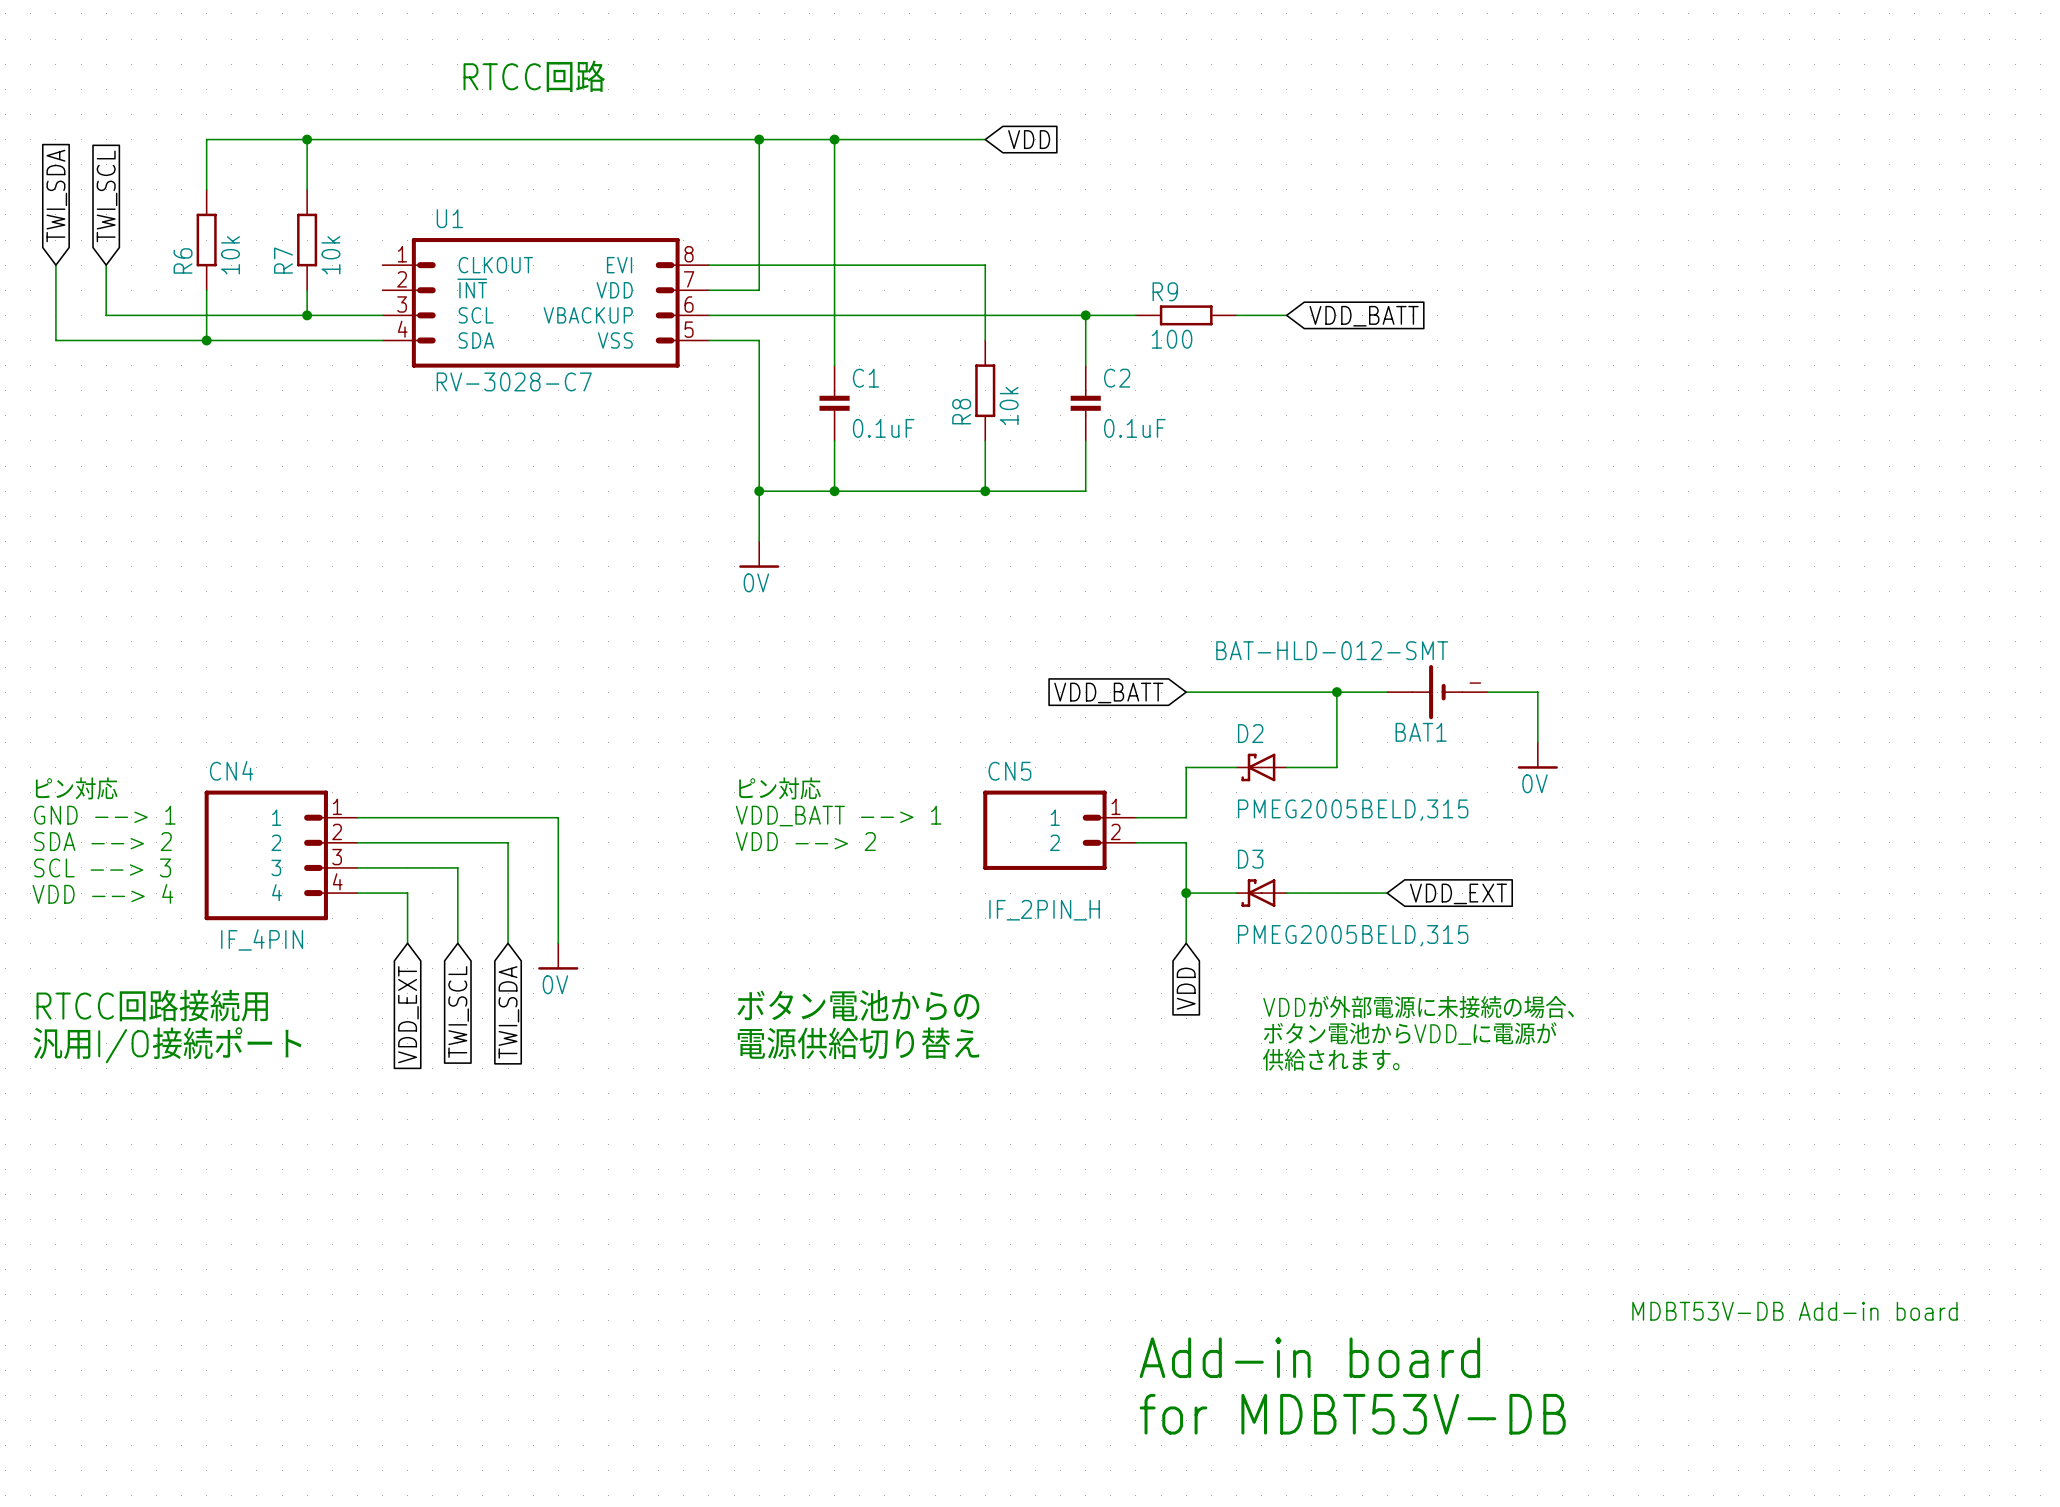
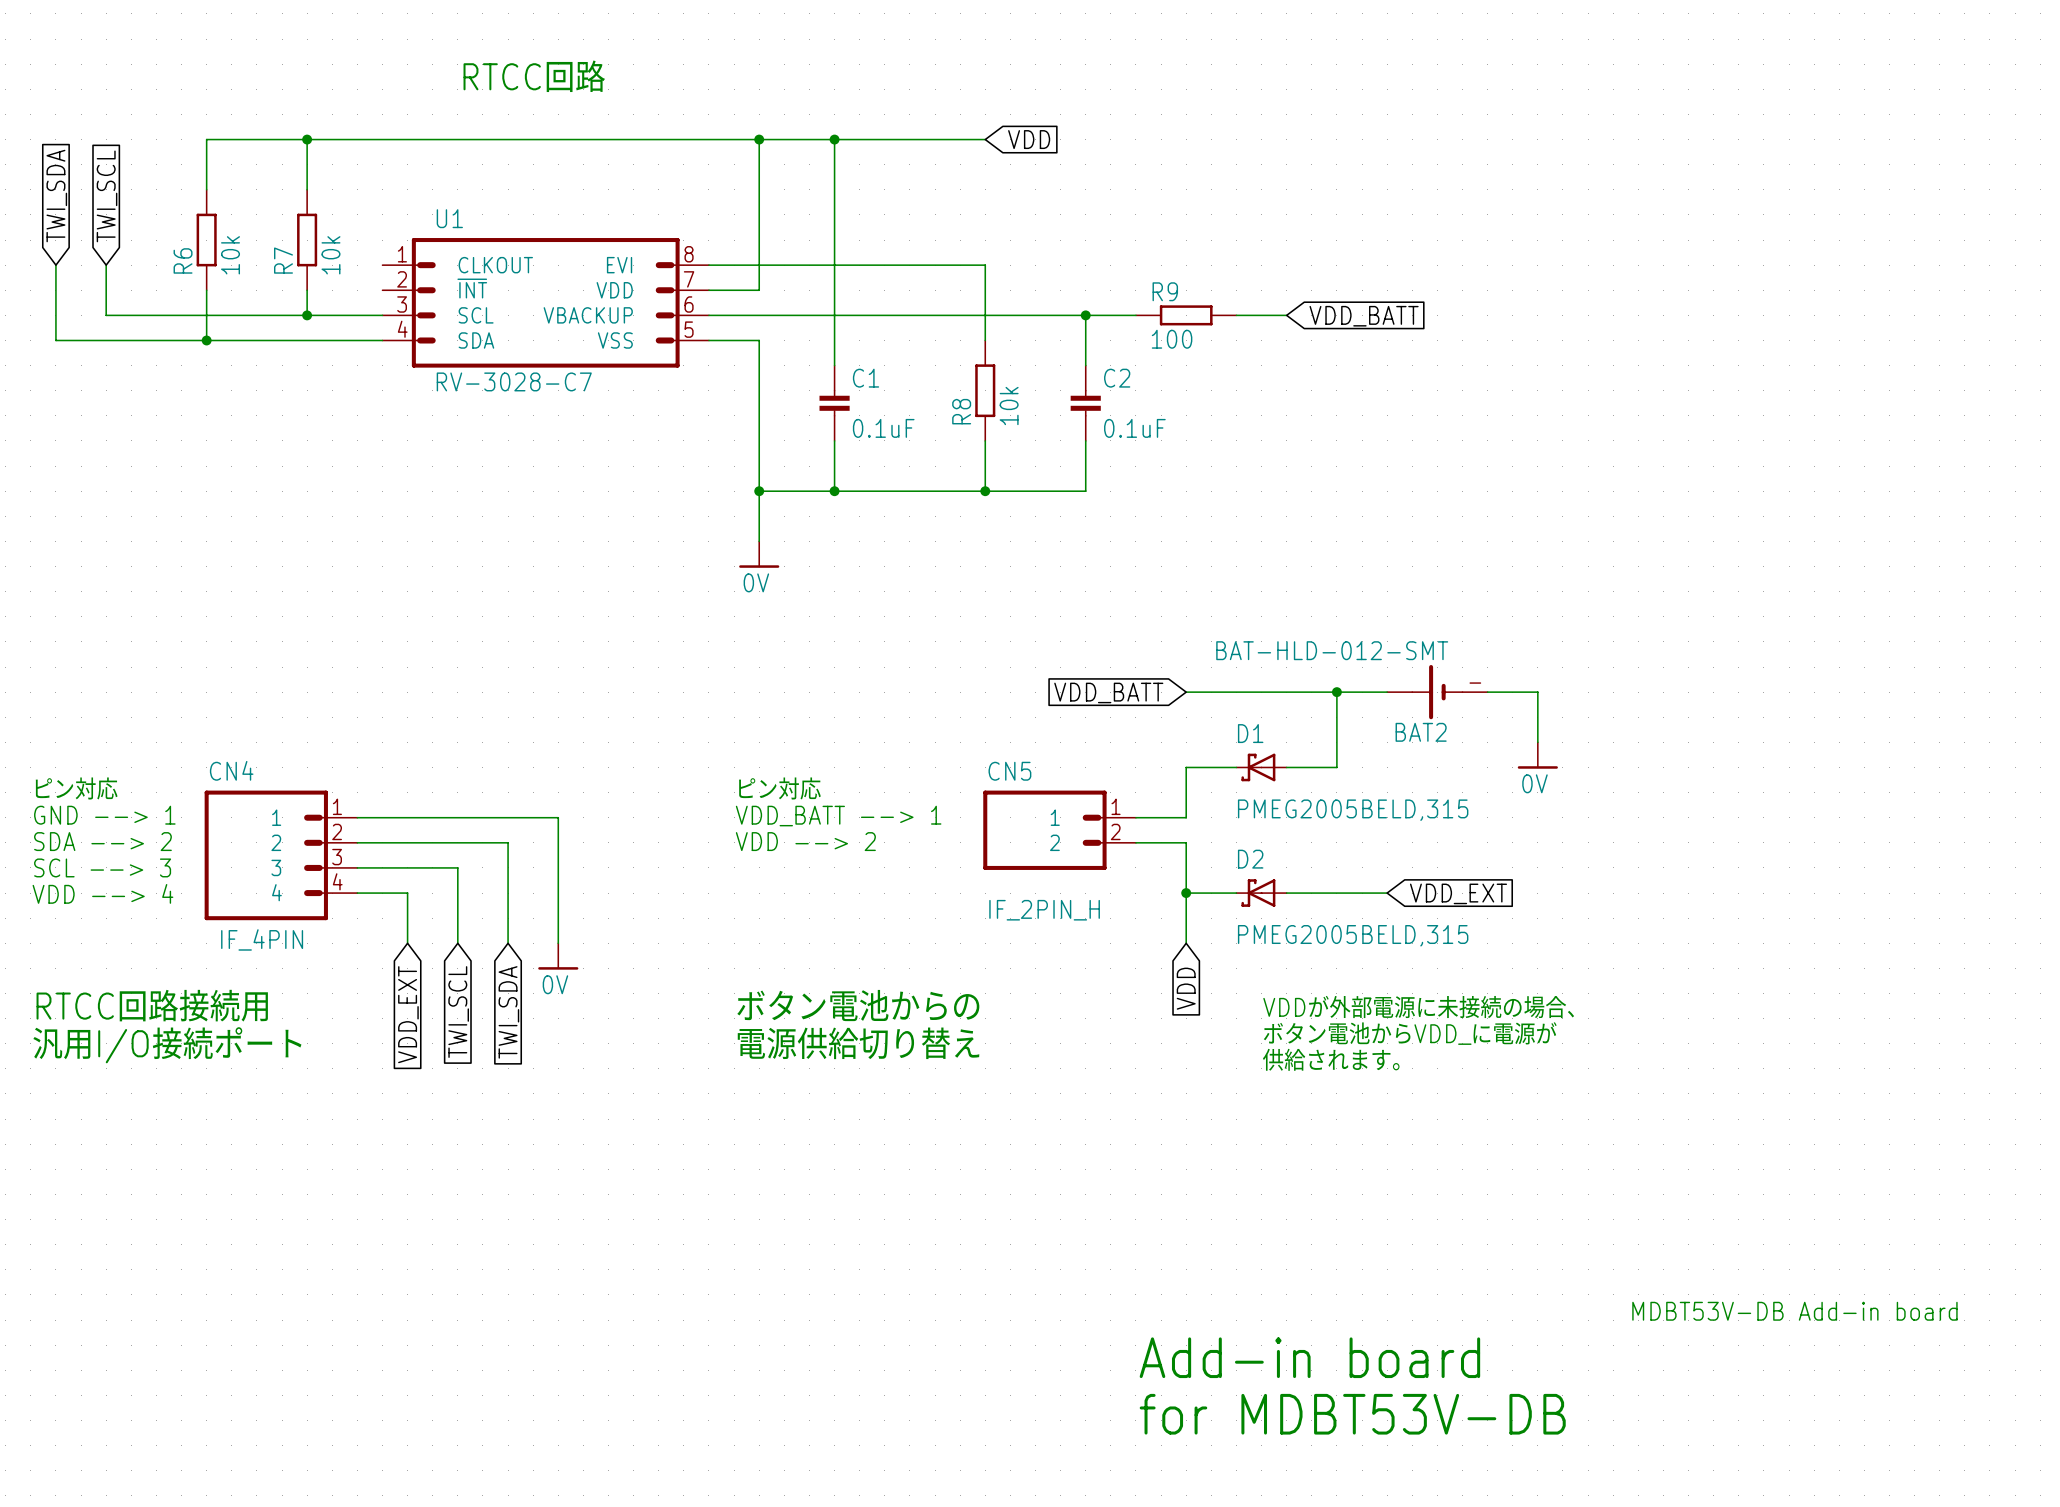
BAT1 name: BAT1 (1421, 732) -> BAT2 (1421, 732)
D2 name: D2 (1250, 733) -> D1 (1250, 733)
D3 name: D3 (1250, 859) -> D2 (1250, 859)

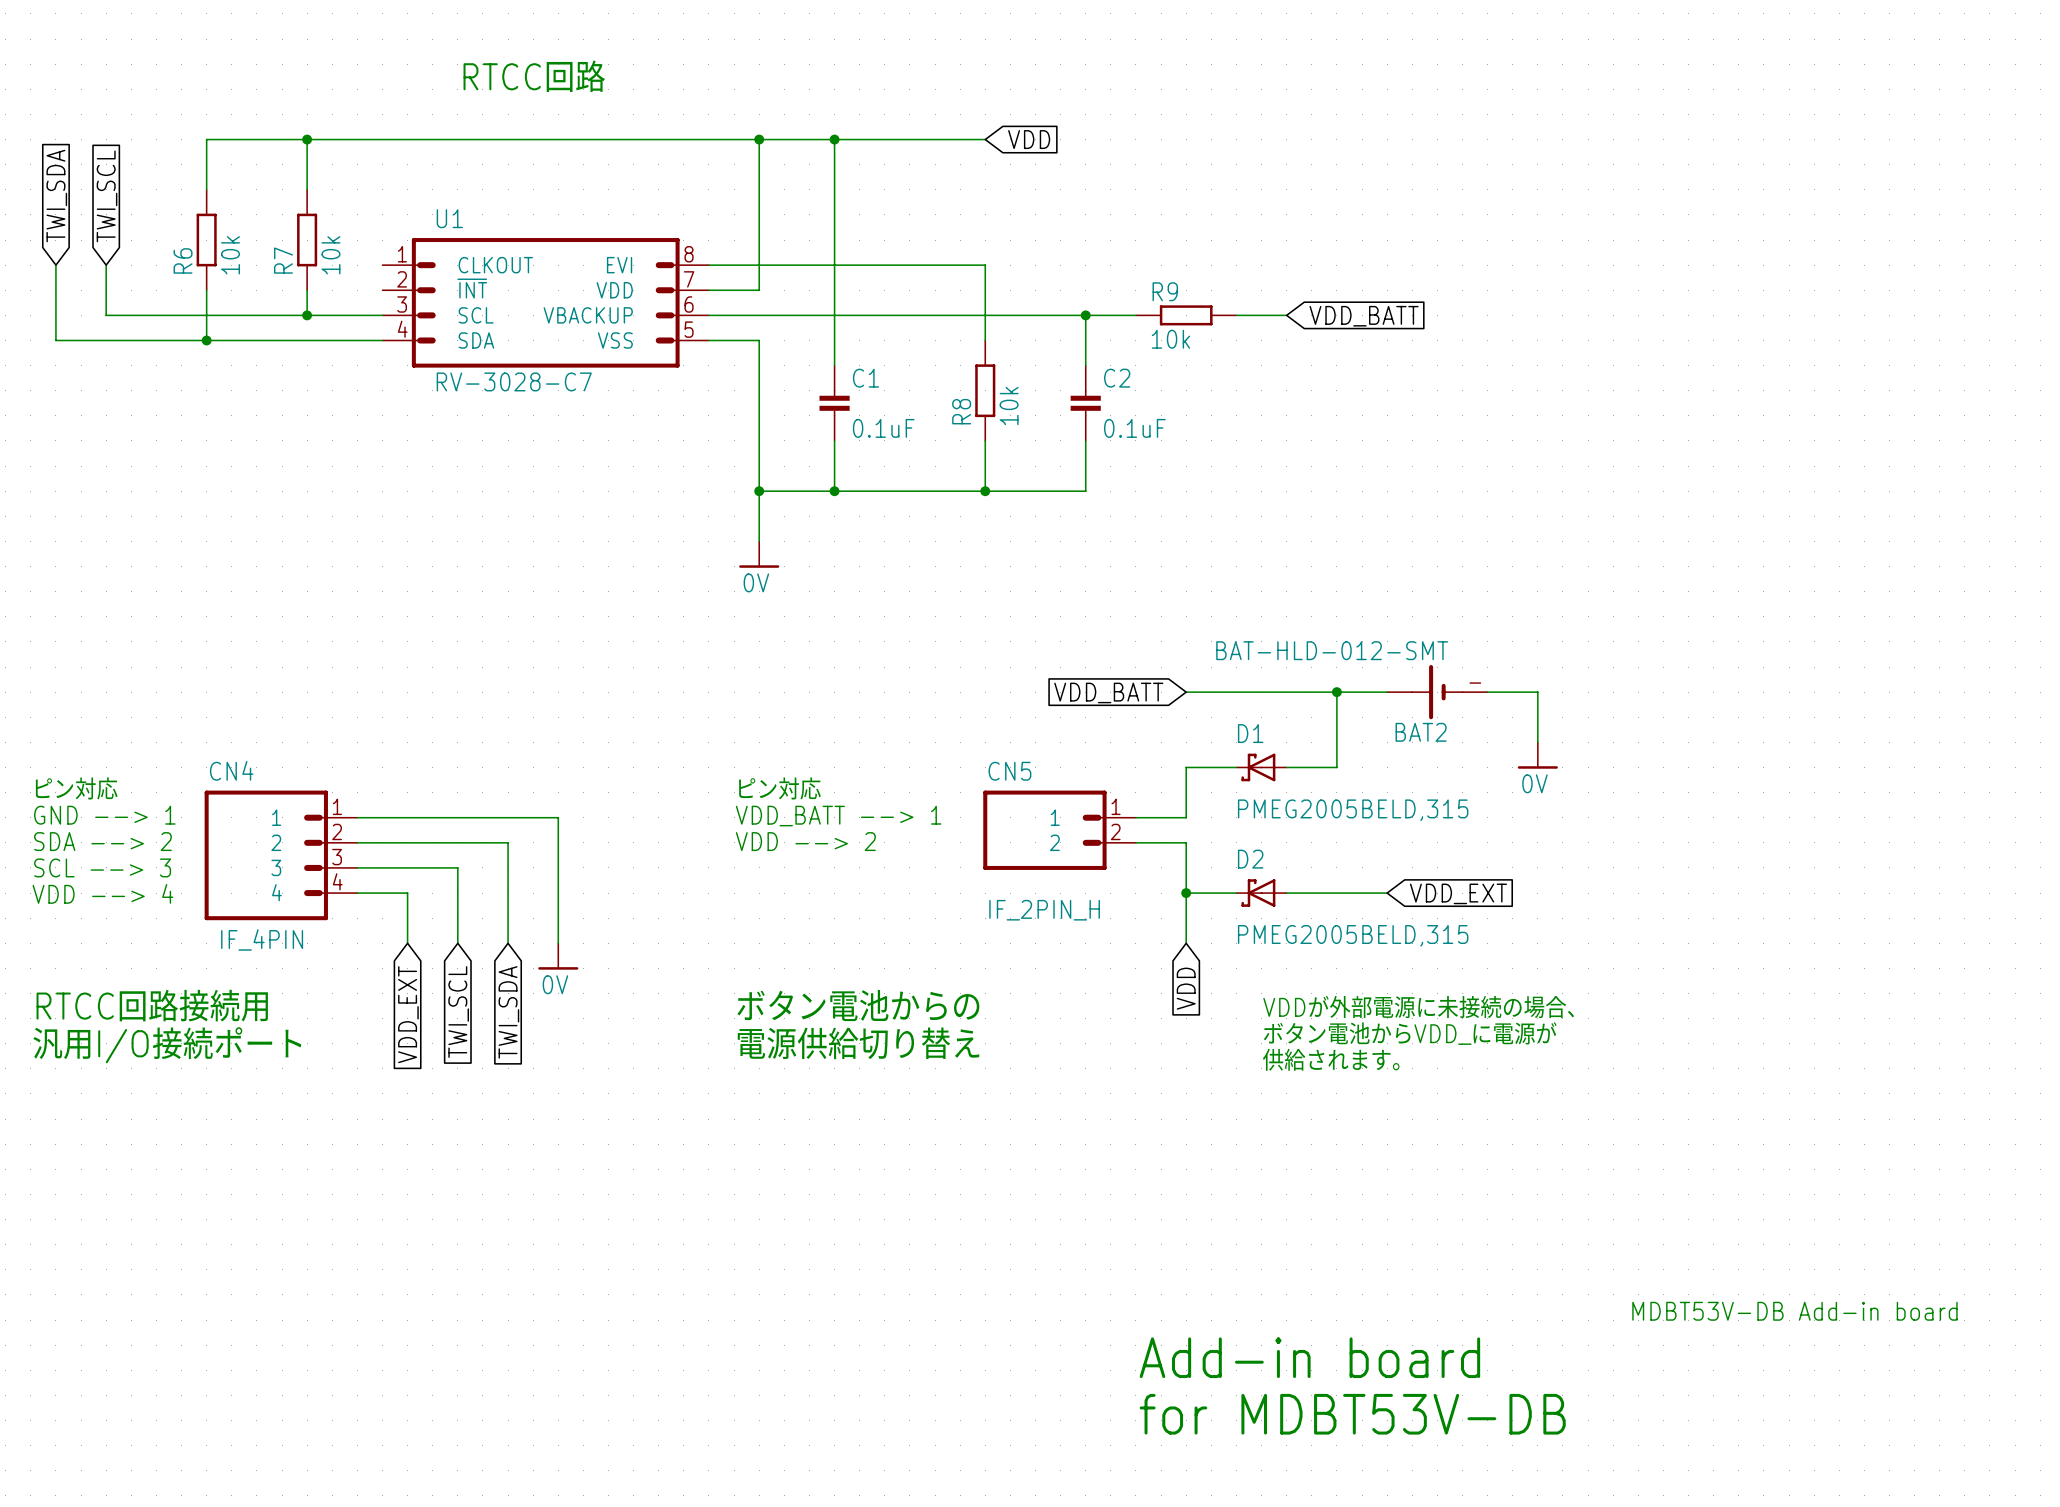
R9 value: 100 (1172, 339) -> 10k (1170, 339)

